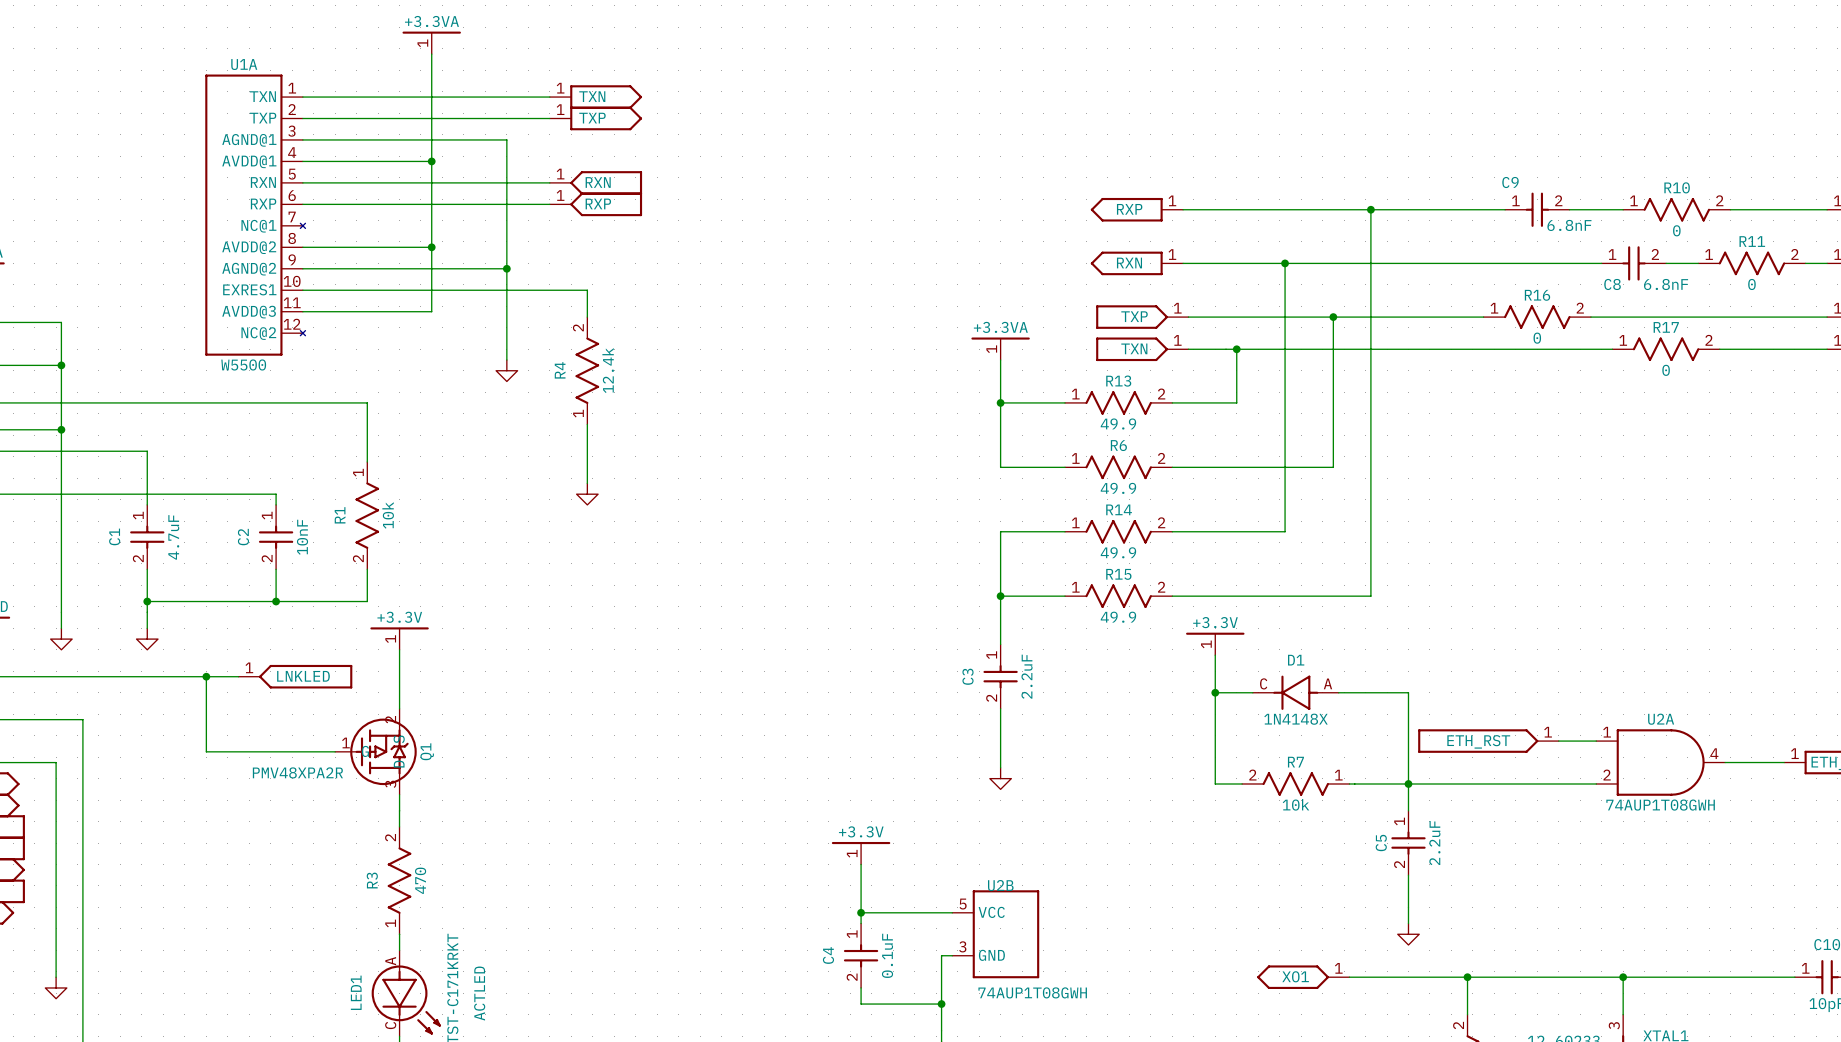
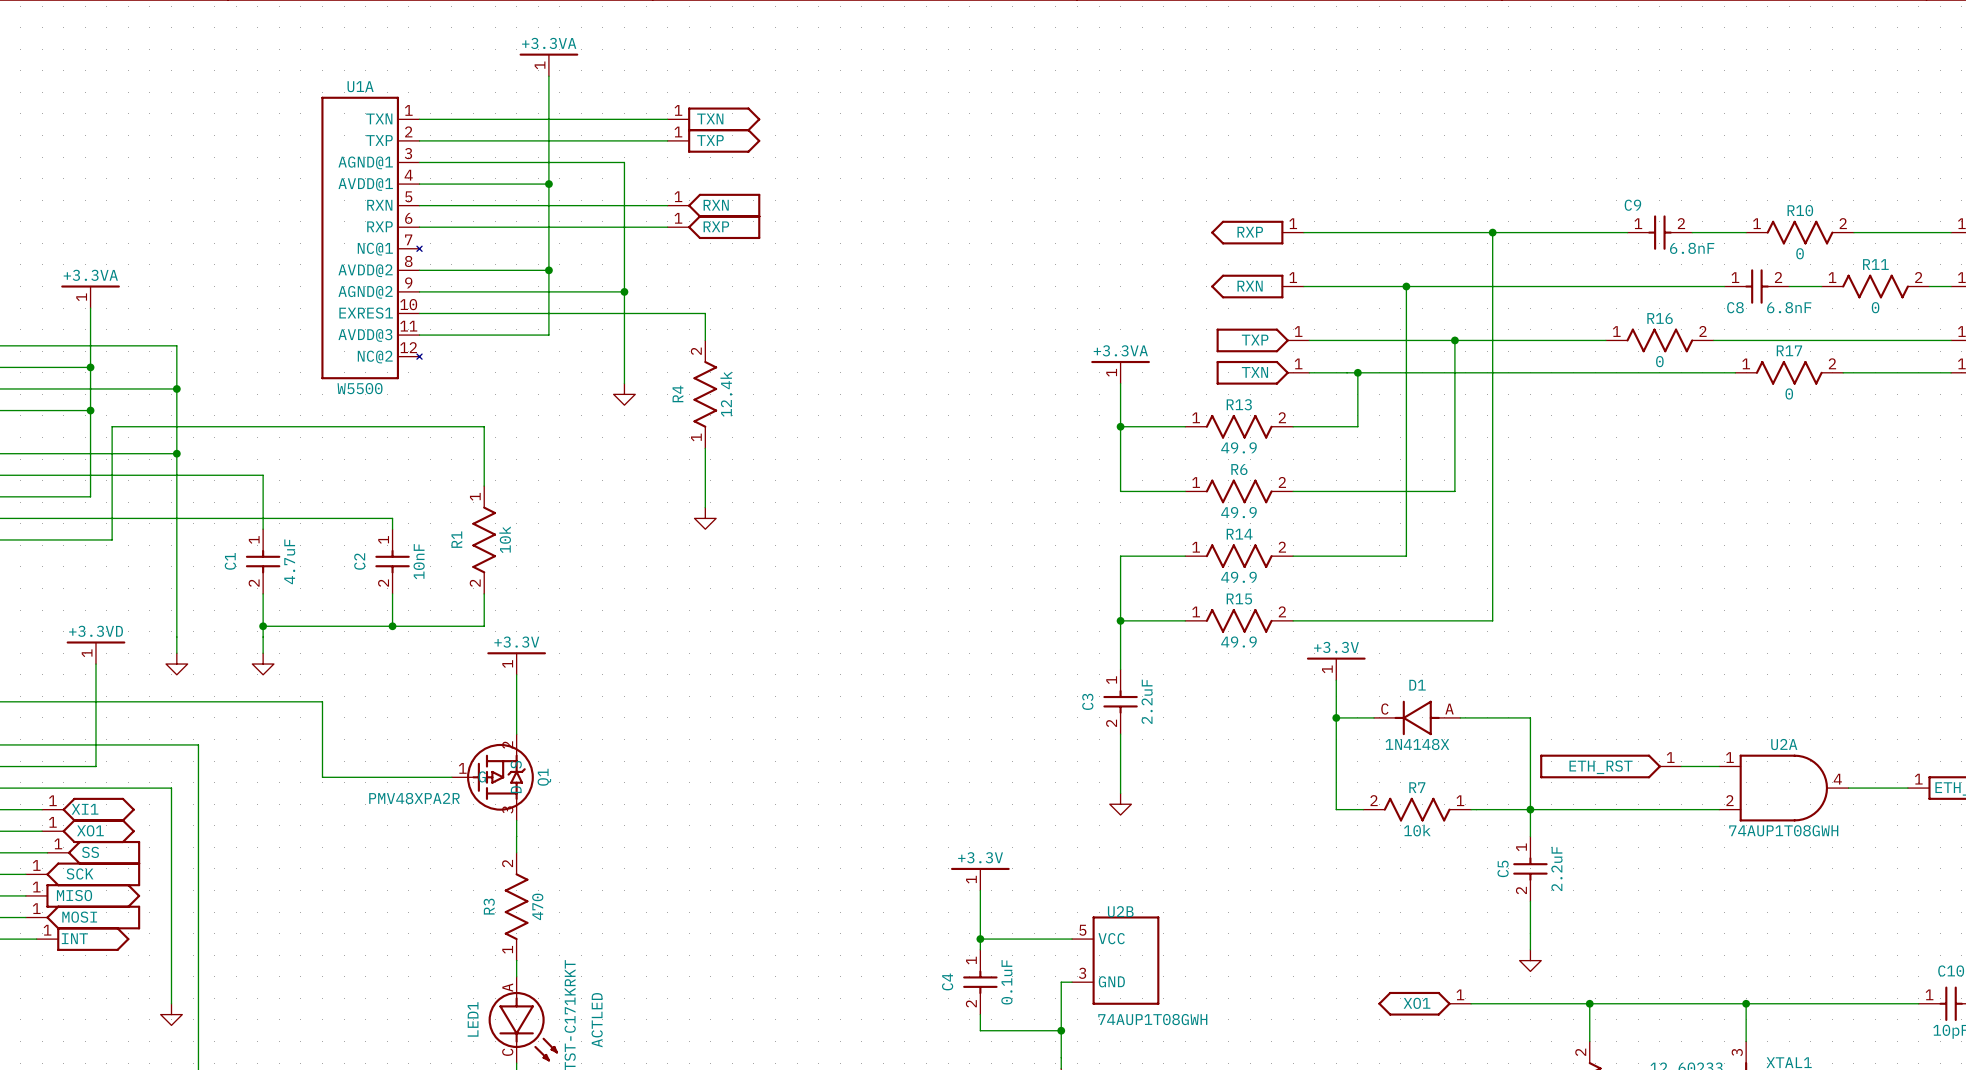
wire: (206, 676) (238, 676) -> none
junction: (206, 676) -> none
power symbol: LNKLED (295, 676) -> none

